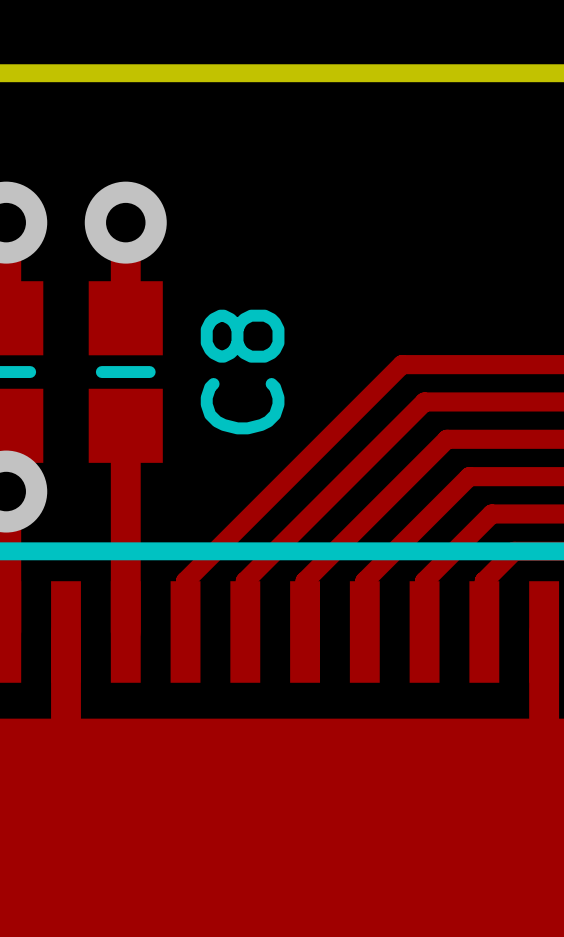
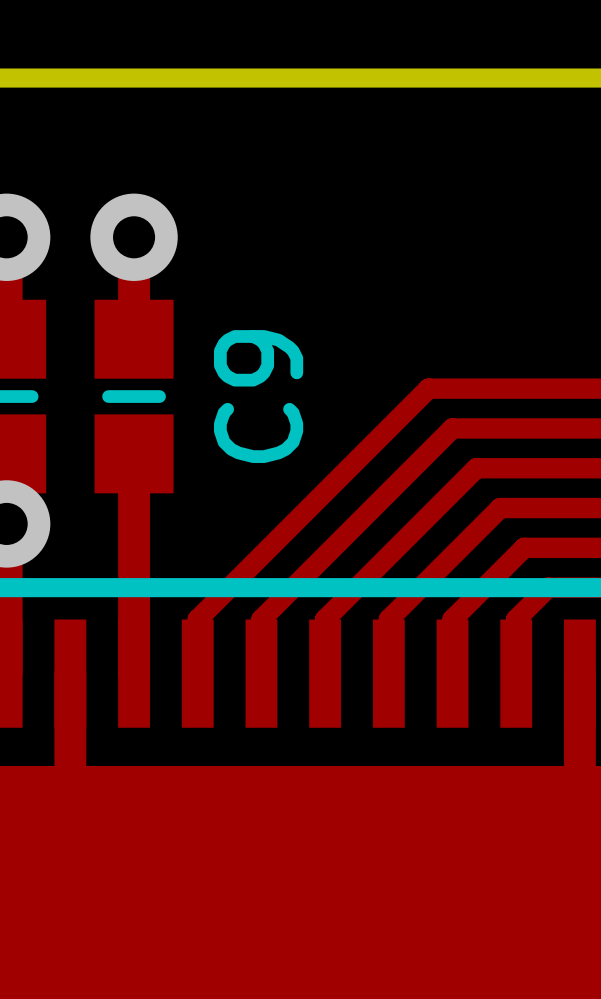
C8 name: C8 (242, 372) -> C9 (258, 396)

